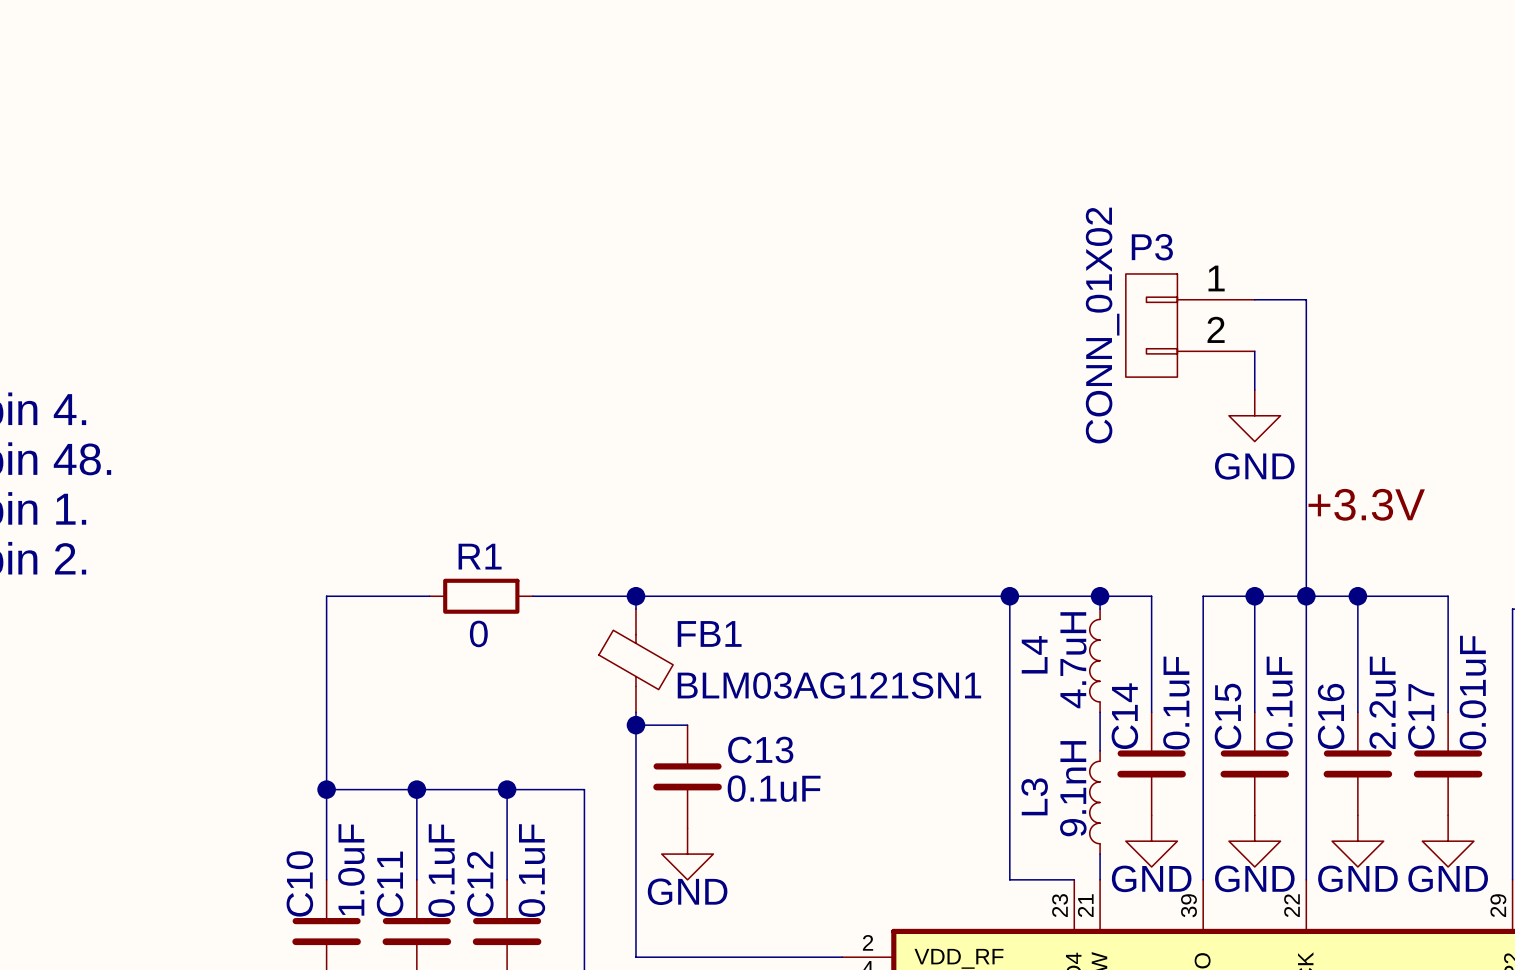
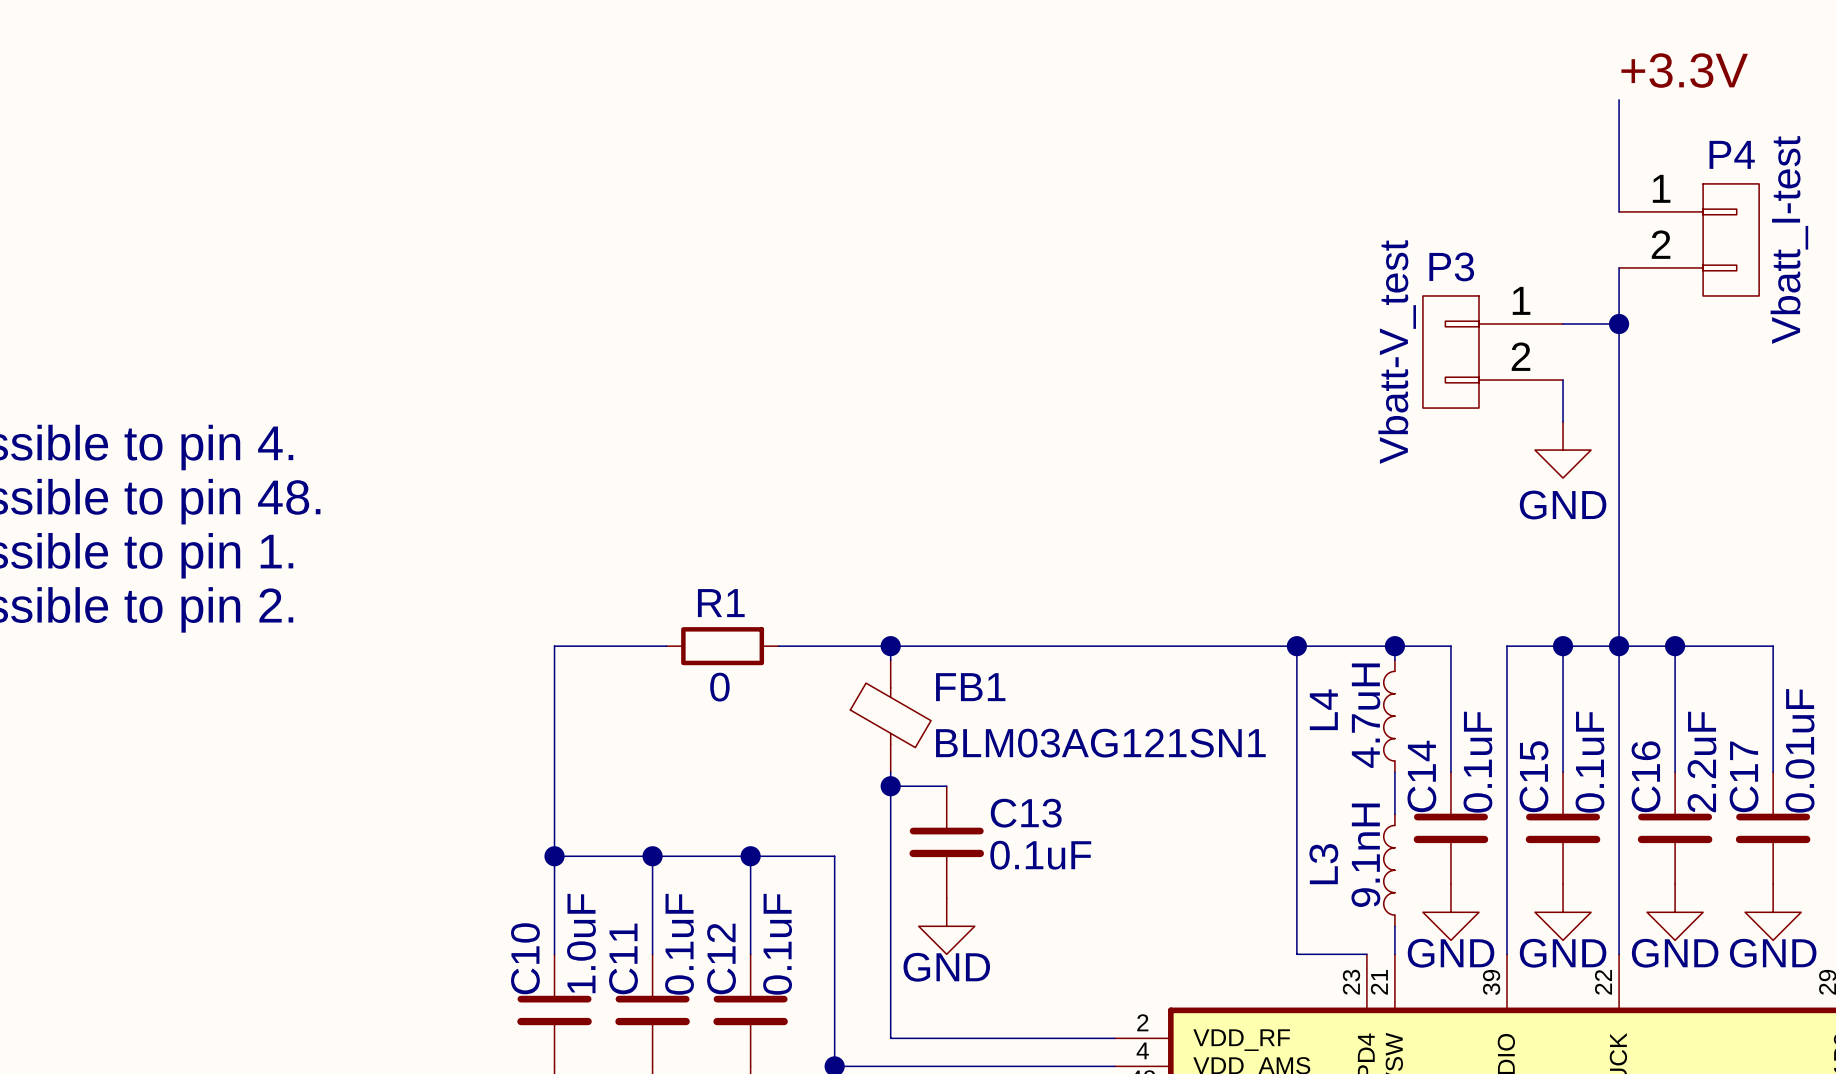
wire: none -> (1619, 99) (1619, 211)
P4: none -> Vbatt_I-test (1689, 239)
wire: none -> (1619, 267) (1619, 324)
junction: none -> (1619, 324)
P3 value: CONN_01X02 (1102, 325) -> Vbatt-V_test (1397, 352)
label position: +3.3V (1366, 504) -> +3.3V (1684, 70)

